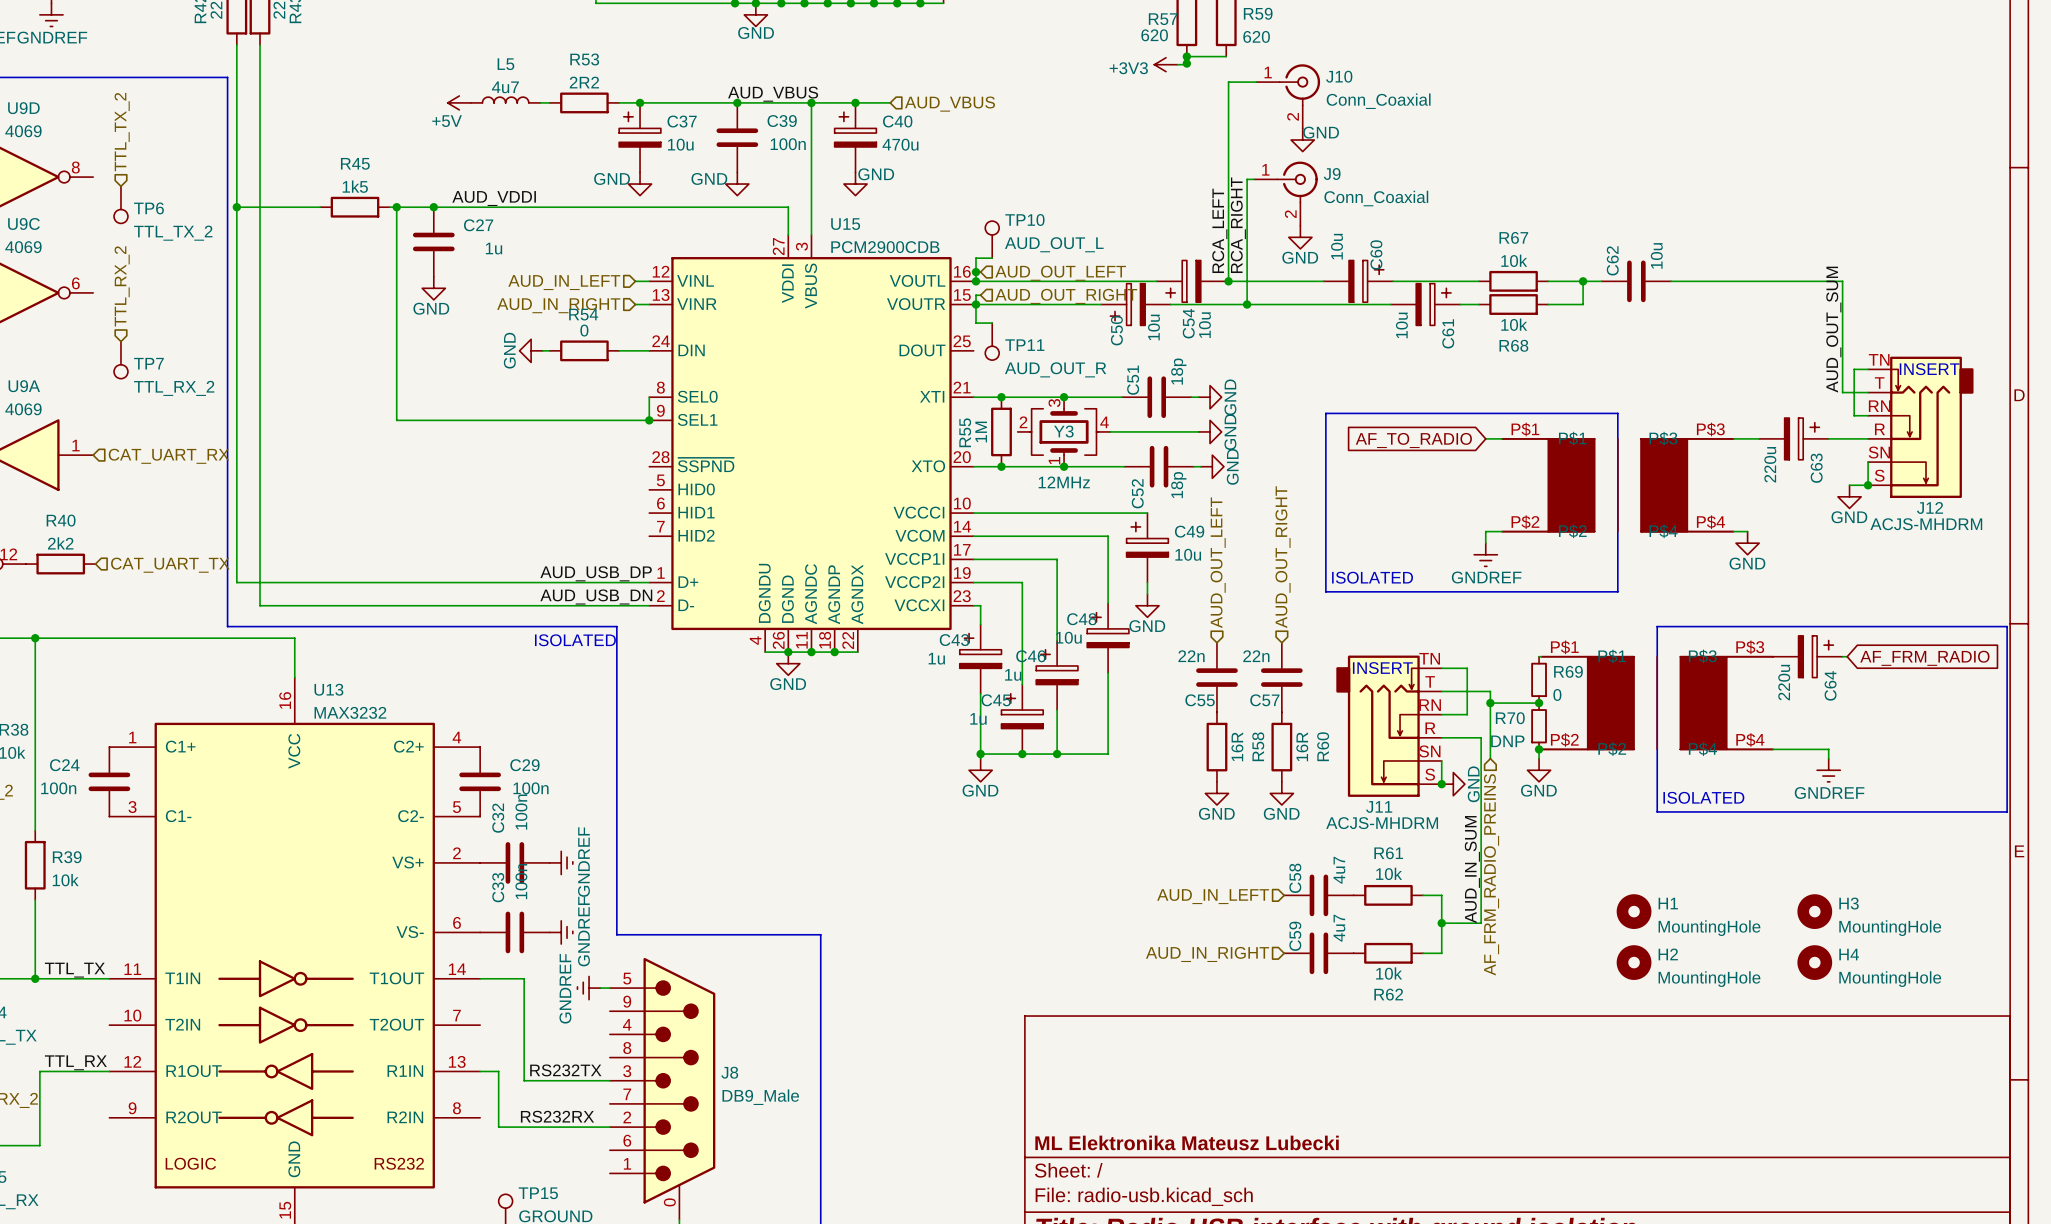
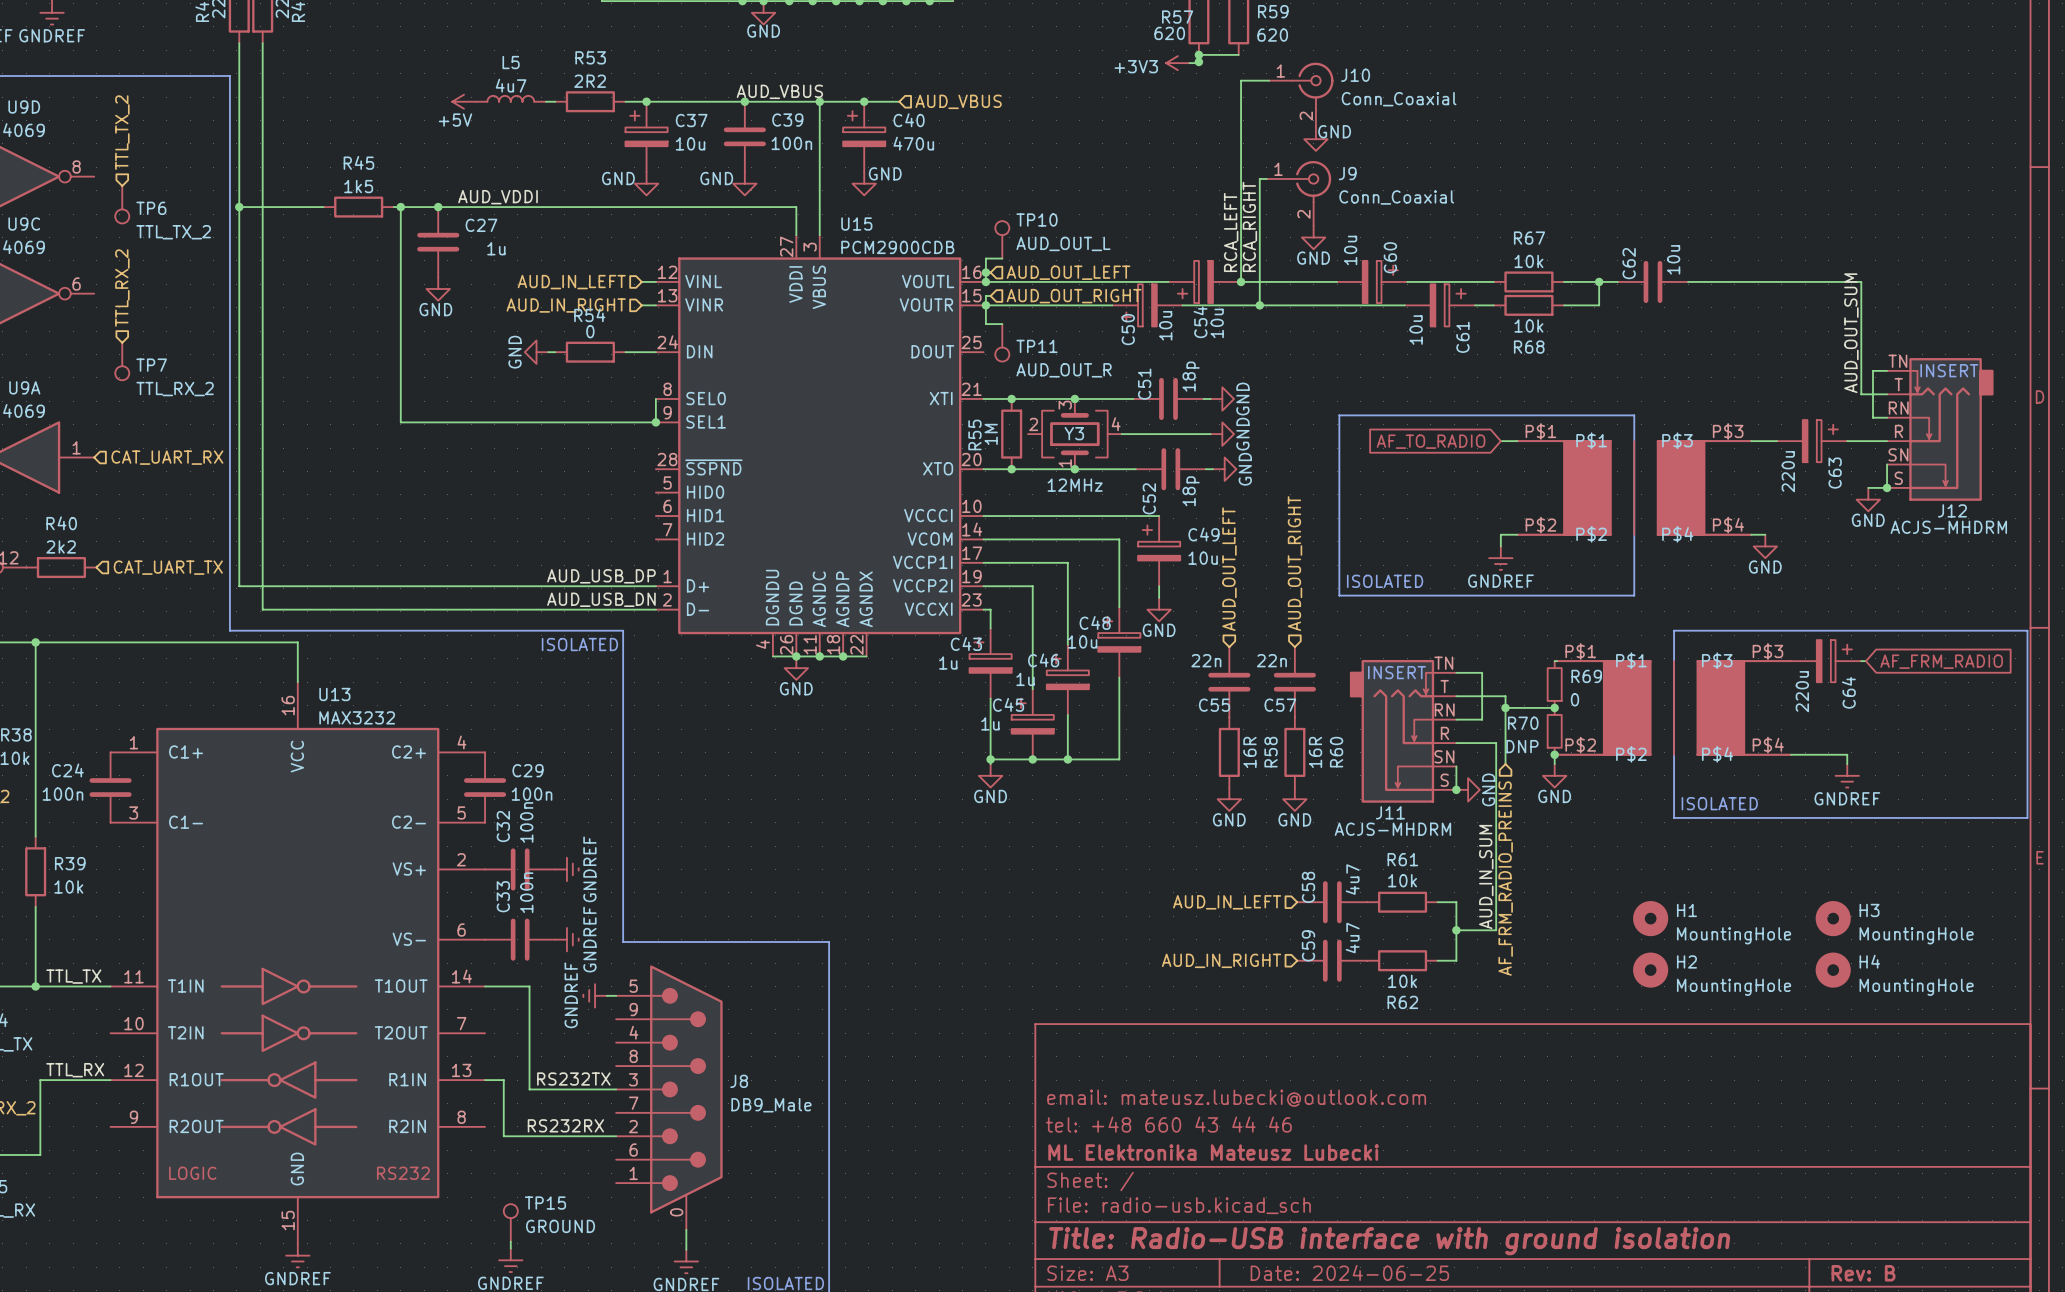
title block: none -> email: mateusz.lubecki@outlook.com (1236, 1098)
title block: none -> tel: +48 660 43 44 46 (1168, 1124)

